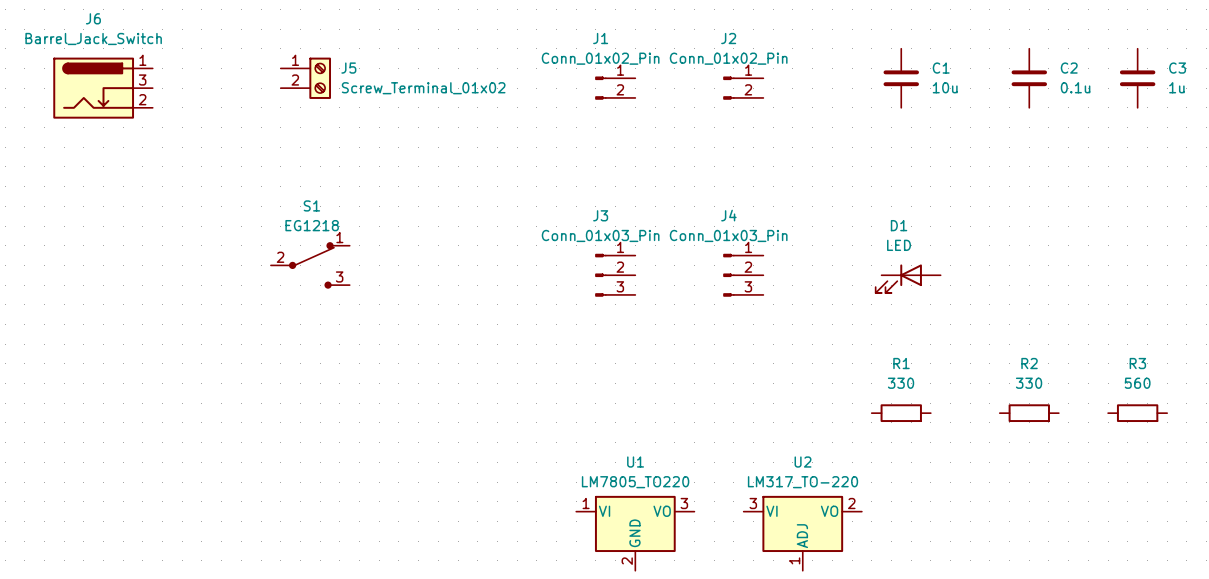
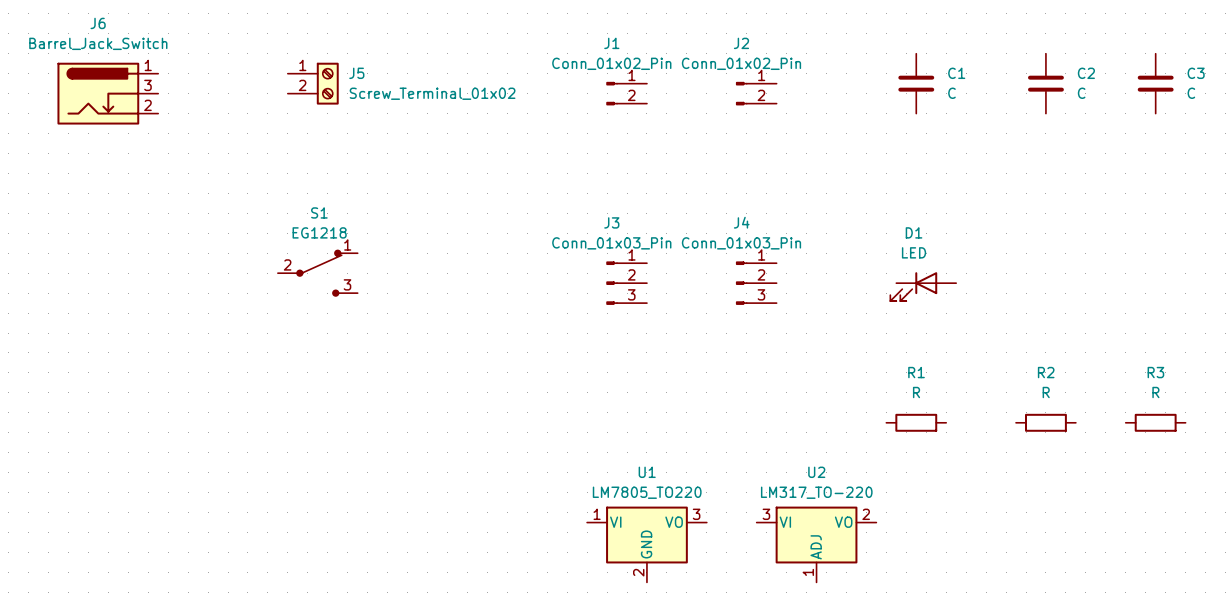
C1 value: 10u (945, 87) -> C (951, 93)
C2 value: 0.1u (1075, 87) -> C (1081, 93)
C3 value: 1u (1176, 87) -> C (1191, 93)
R1 value: 330 (901, 383) -> R (916, 392)
R2 value: 330 (1029, 383) -> R (1046, 392)
R3 value: 560 (1137, 383) -> R (1155, 392)

